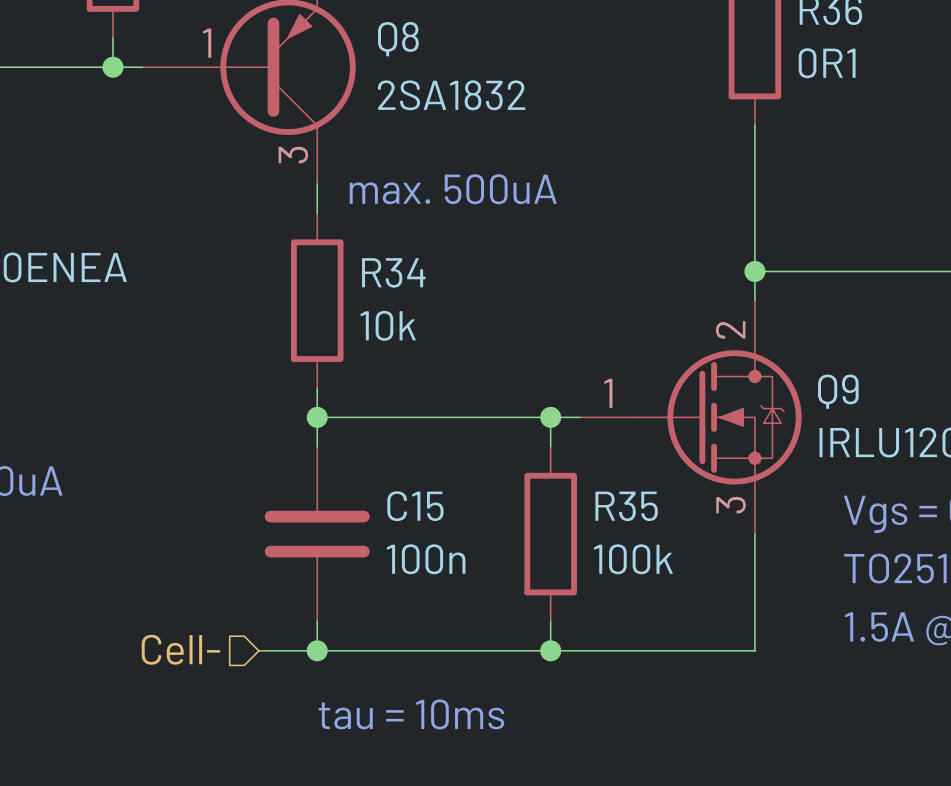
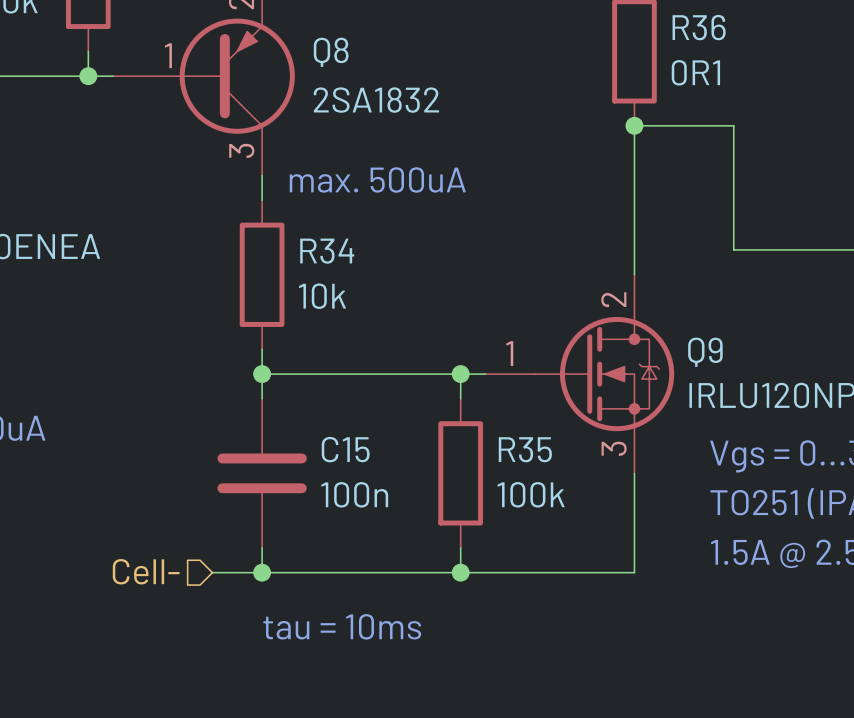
junction: none -> (634, 125)
wire: (754, 271) (871, 271) -> (634, 125) (733, 125) (733, 249)
junction: (754, 271) -> none

